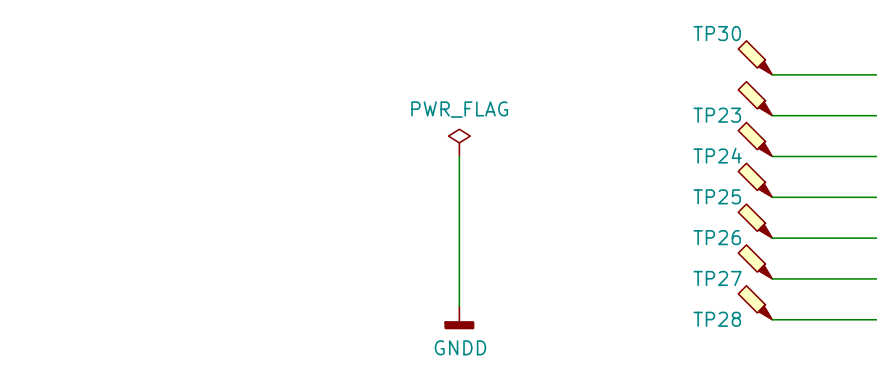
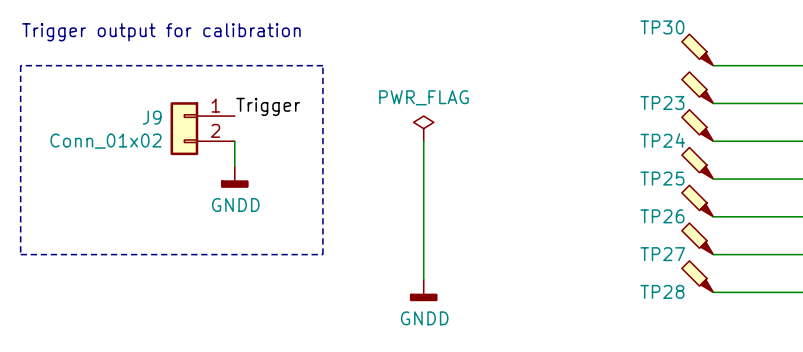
text: none -> Trigger output for calibration (161, 32)
line: none -> (20, 65) (20, 254) (322, 254) (322, 65) (20, 65)
label: none -> Trigger (268, 106)
J9: none -> Conn_01x02 (202, 128)
wire: none -> (234, 141) (234, 166)
power symbol: none -> GNDD (234, 177)

